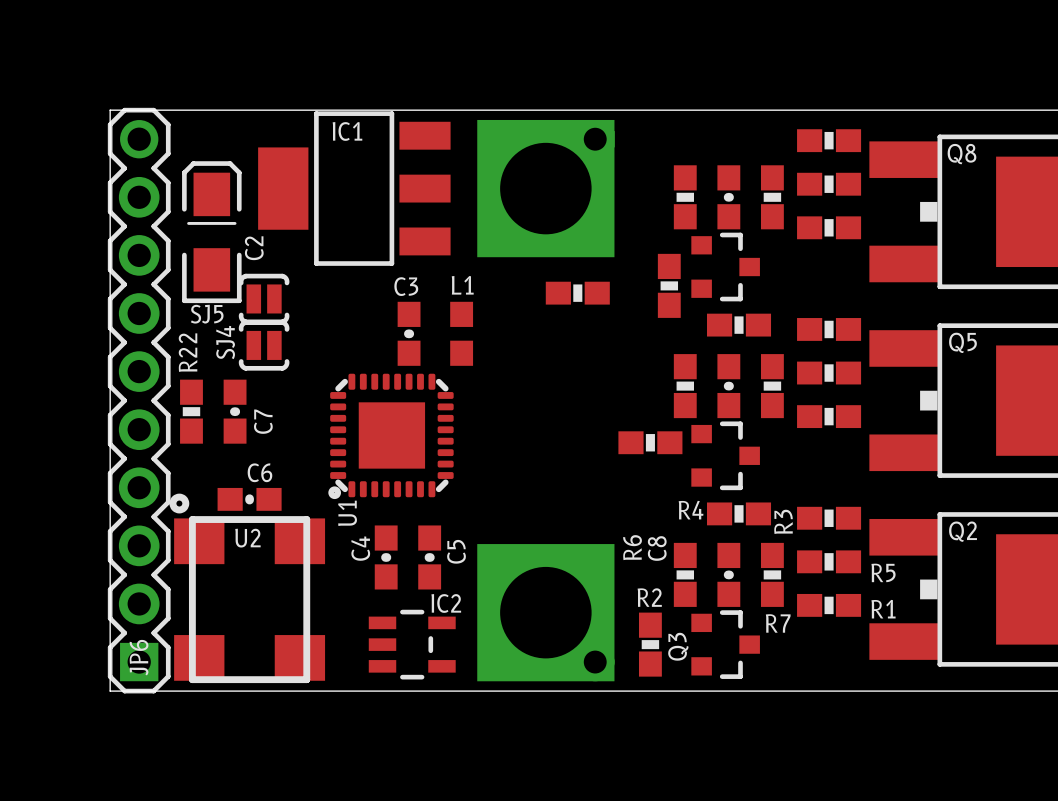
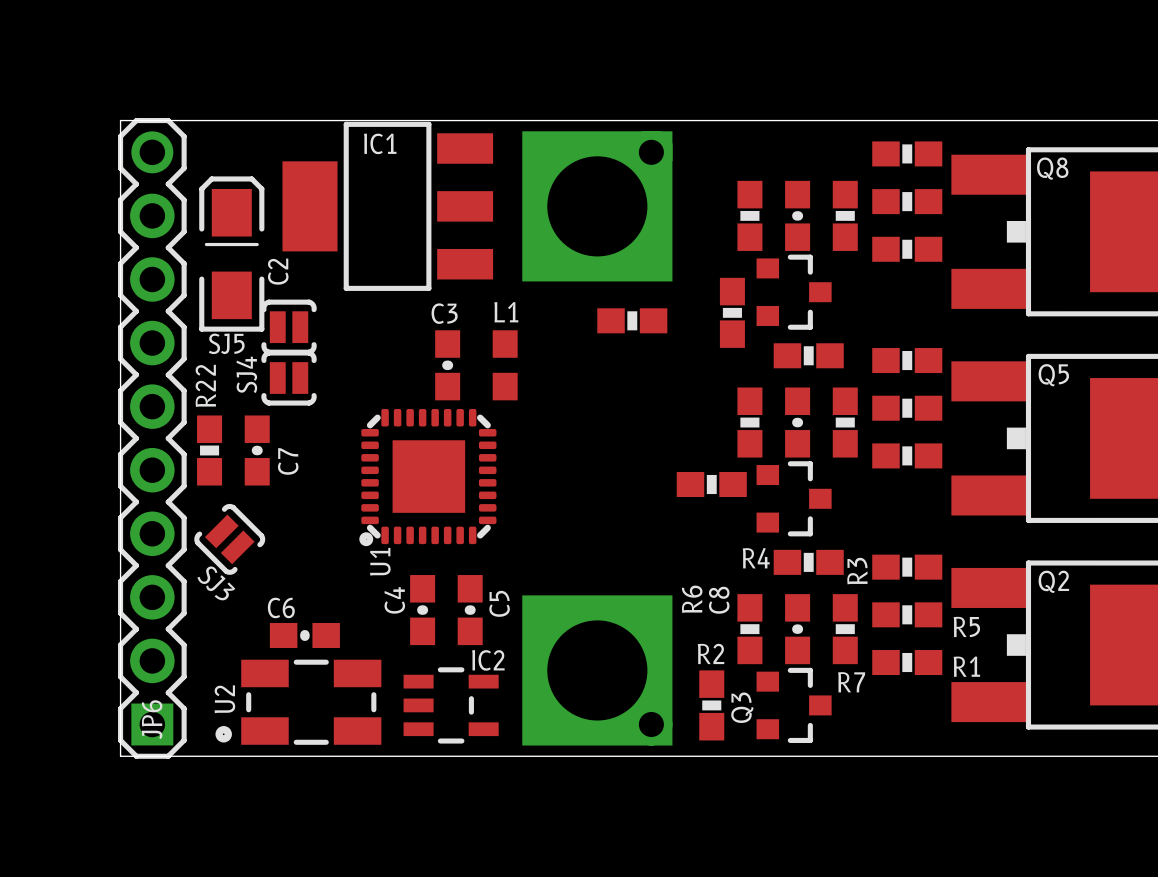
C6 name position: C6 (259, 472) -> C6 (281, 607)
SJ3: none -> (229, 539)
U2 footprint: [169, 493, 326, 684] -> [215, 659, 382, 745]
C6 position: (249, 499) -> (304, 635)
U2 name position: U2 (247, 538) -> U2 (224, 699)

